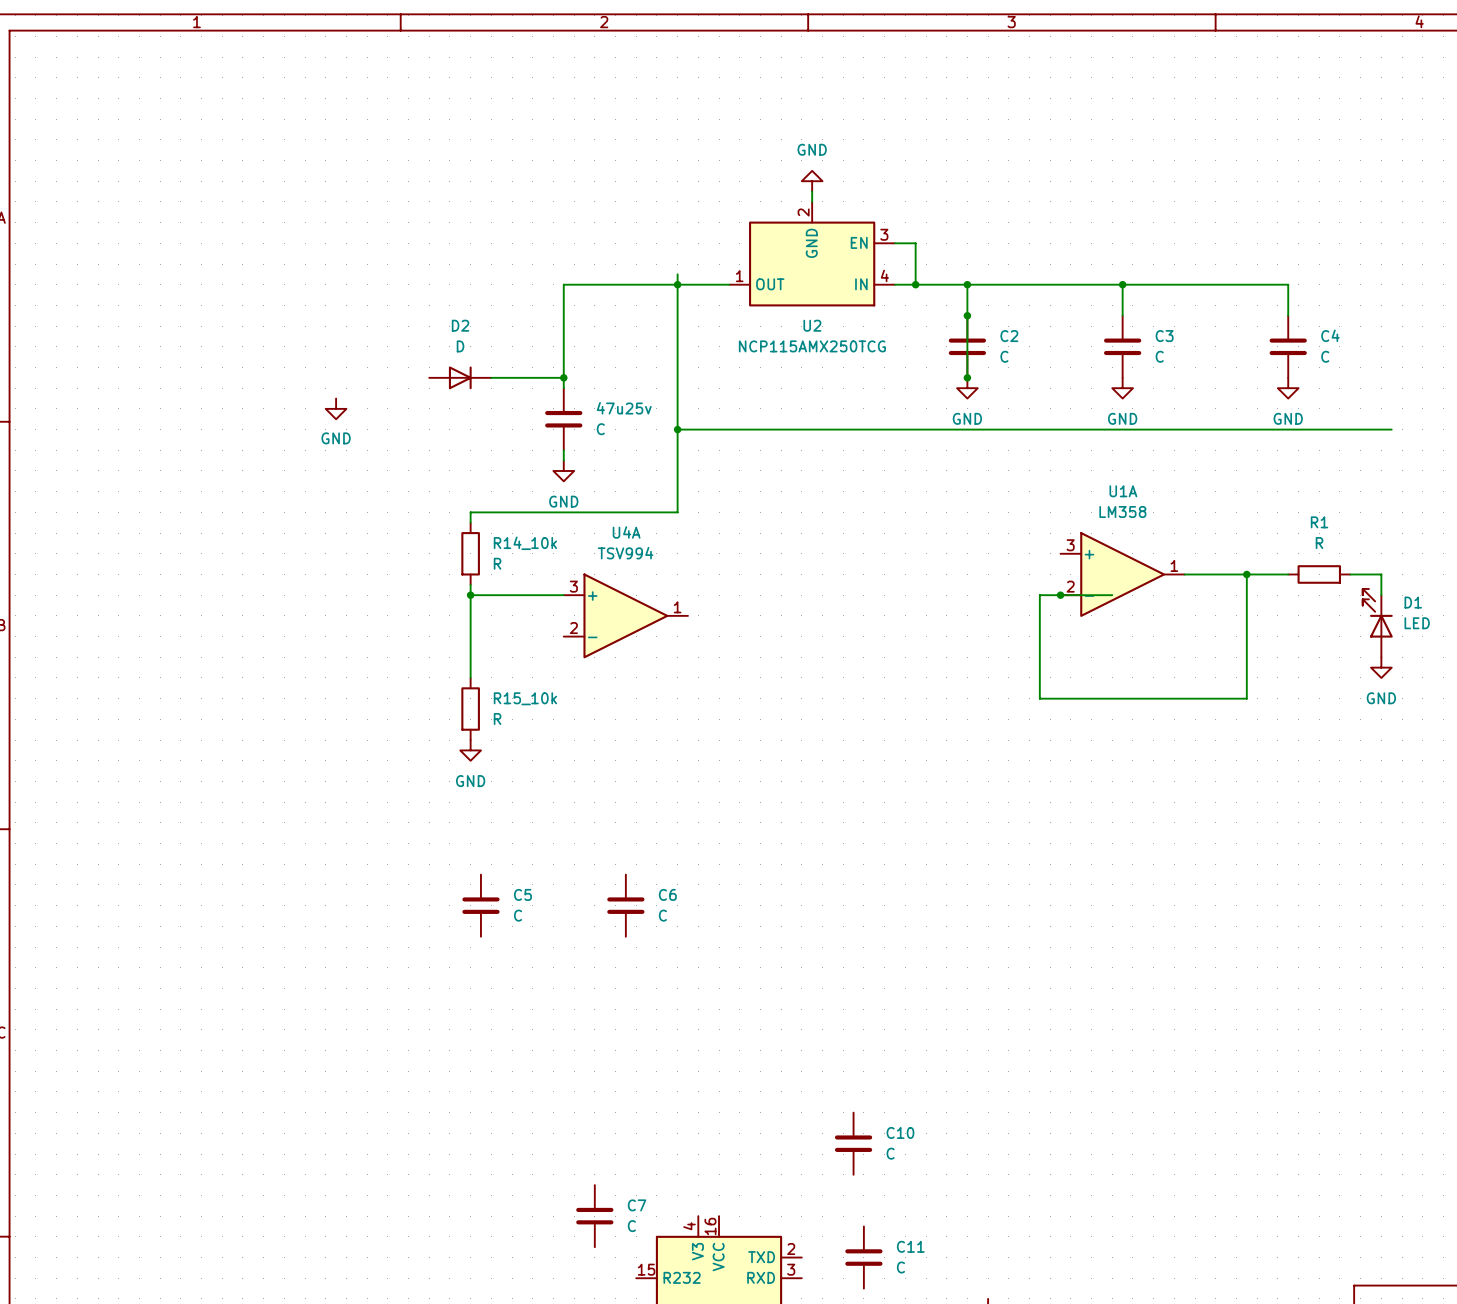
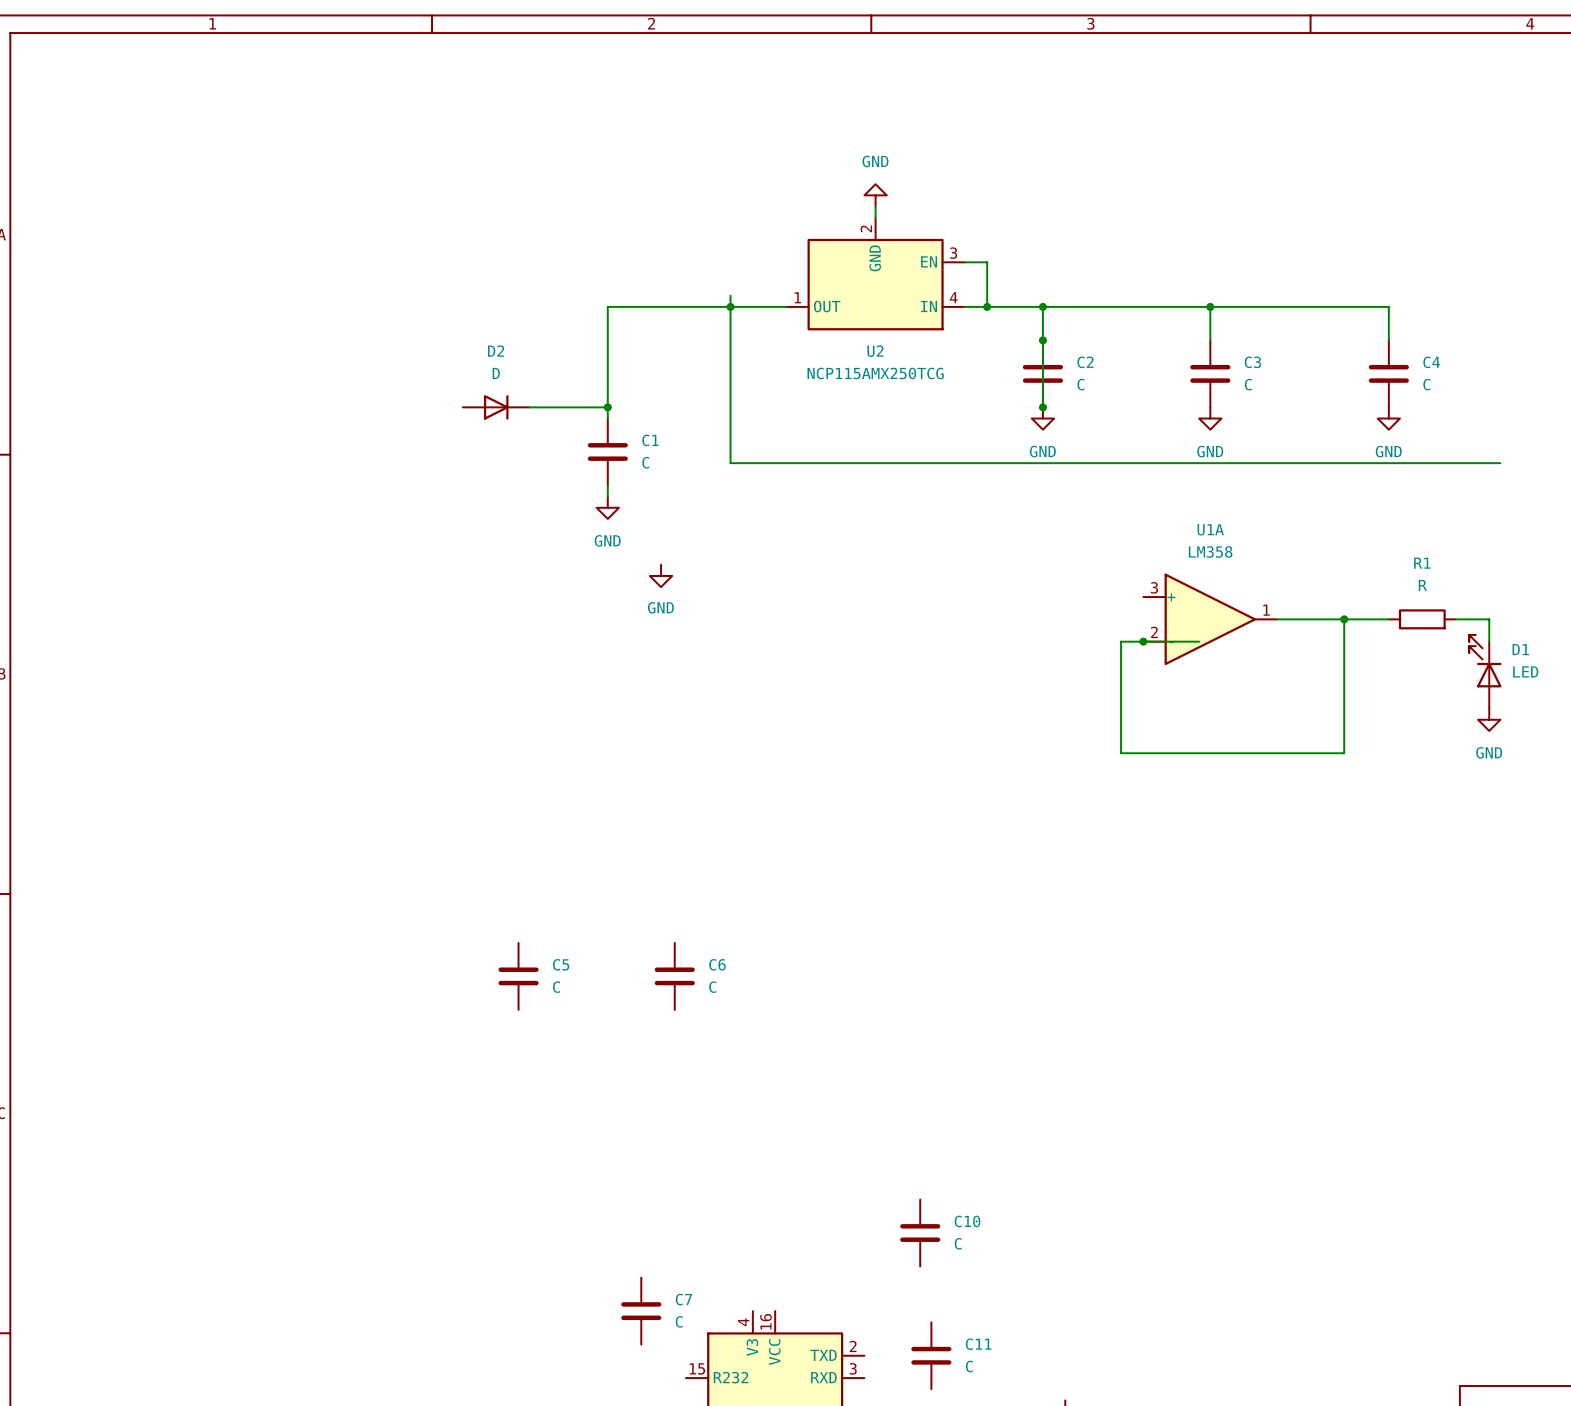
power symbol: GND (336, 408) -> none
47u25v name: 47u25v (624, 408) -> C1 (650, 440)
wire: (677, 429) (677, 512) (470, 512) (470, 522) -> none
junction: (677, 429) -> none
power symbol: none -> GND (661, 575)
R14_10k: R (470, 553) -> none
wire: (470, 584) (470, 677) -> none
wire: (470, 595) (563, 595) -> none
junction: (470, 595) -> none
U4A: TSV994 (625, 615) -> none
R15_10k: R (470, 709) -> none
power symbol: GND (470, 750) -> none

